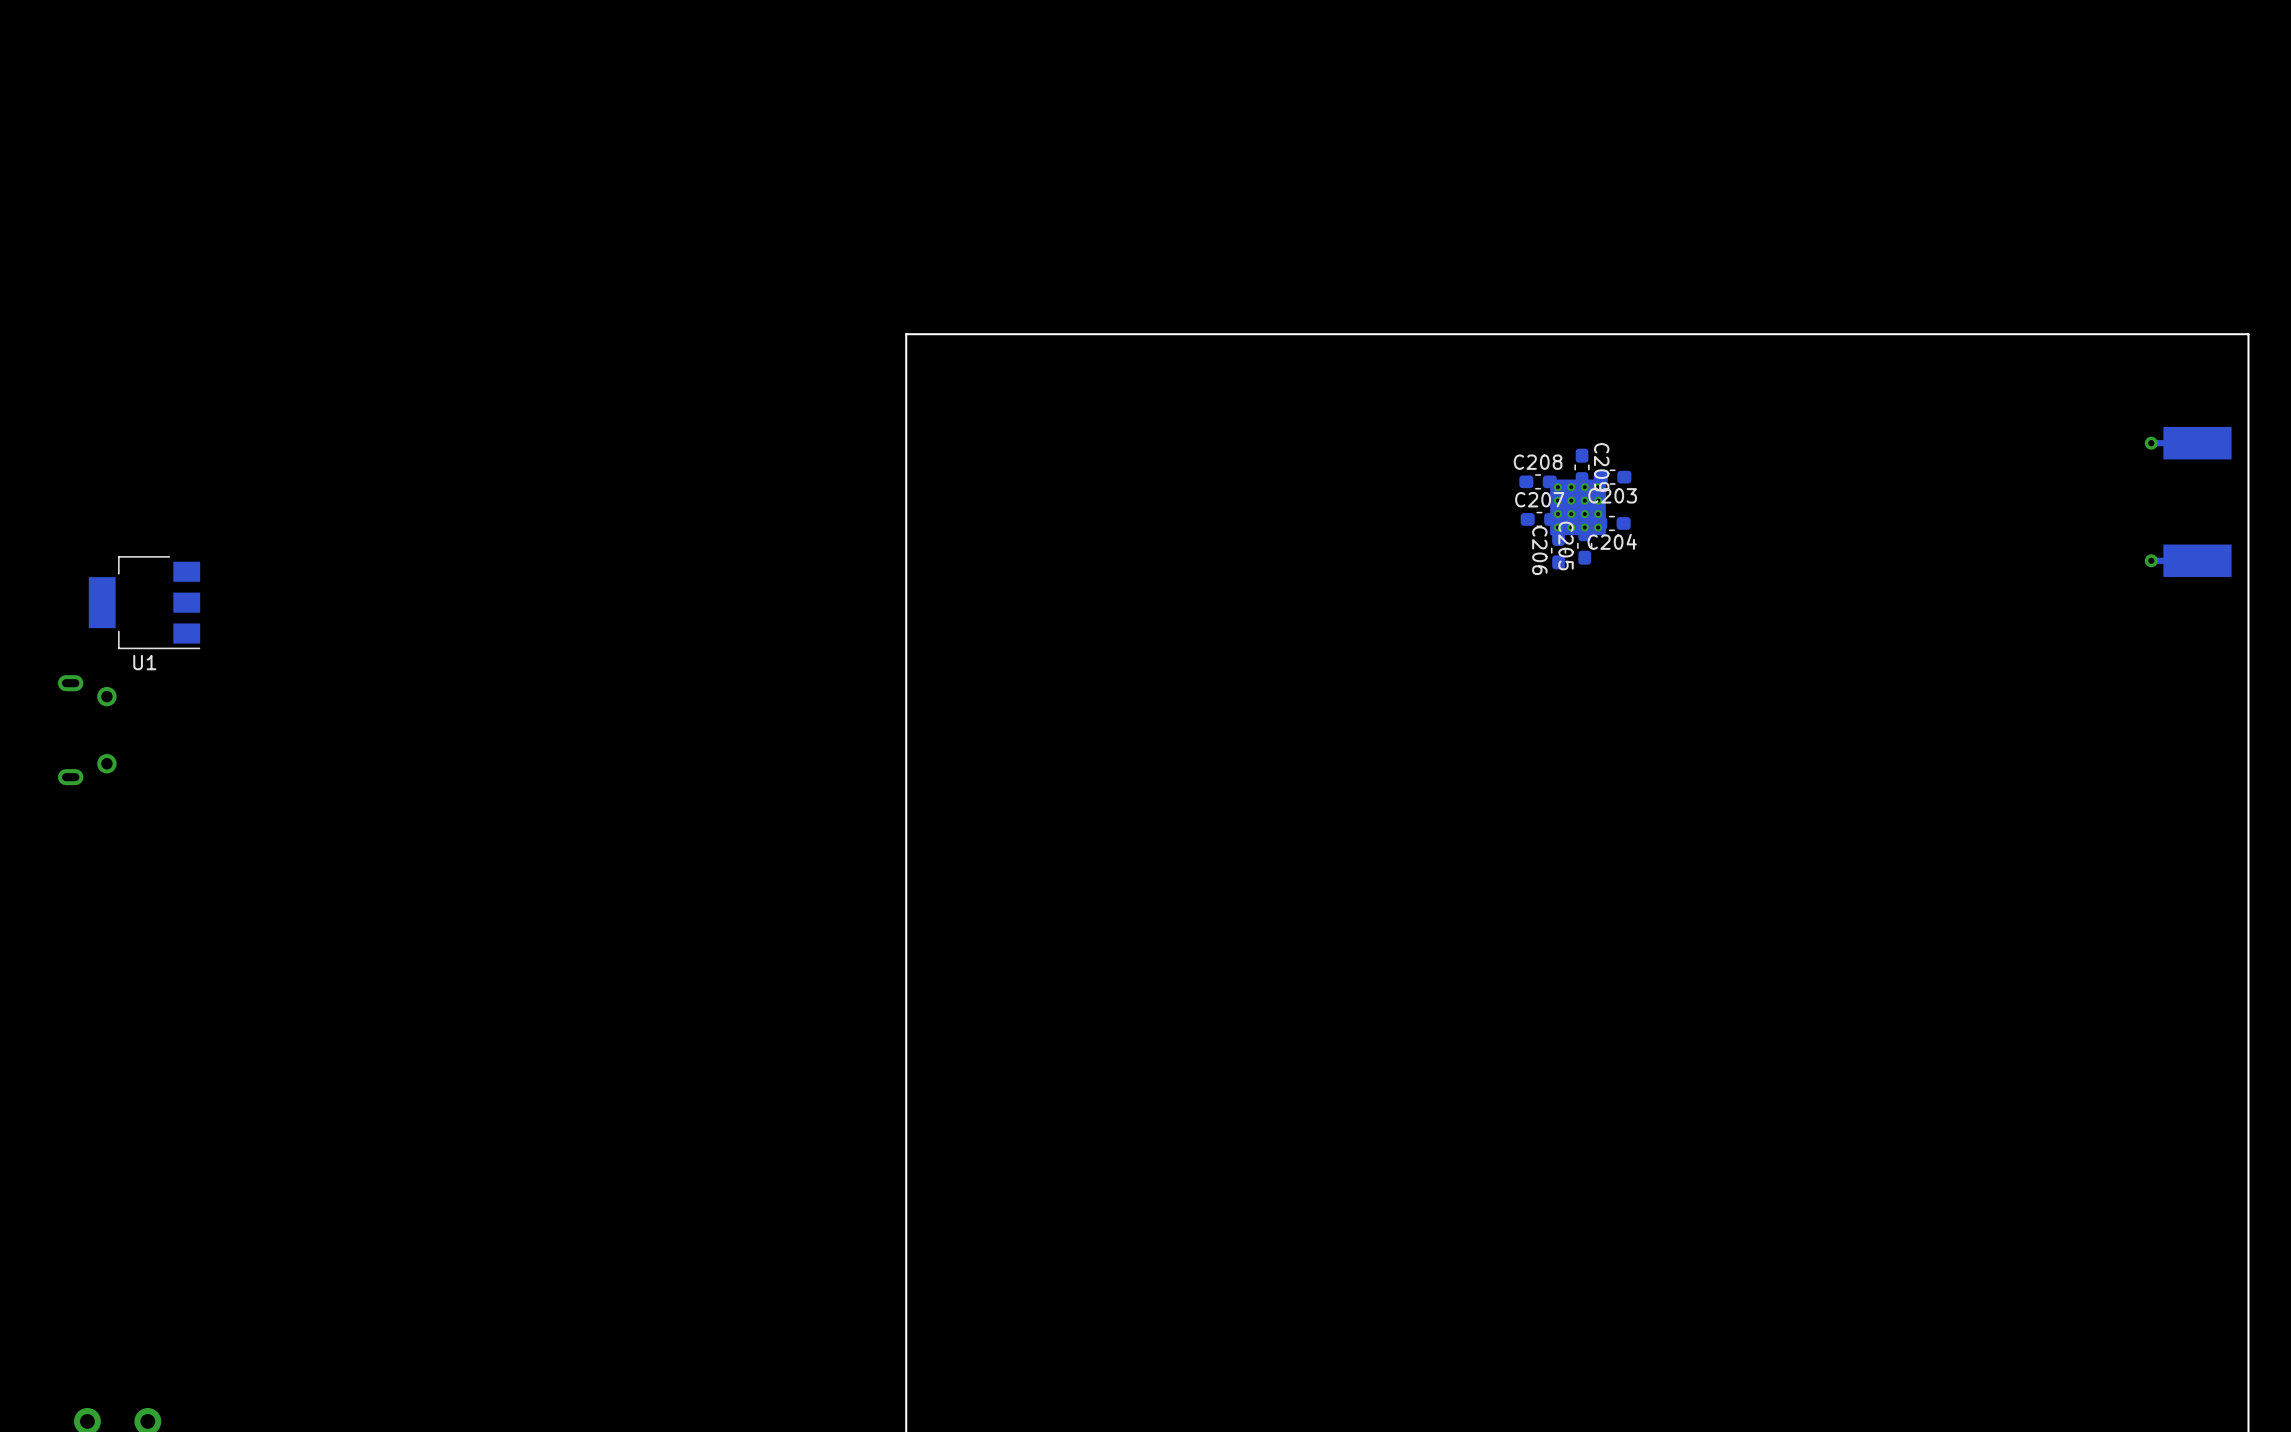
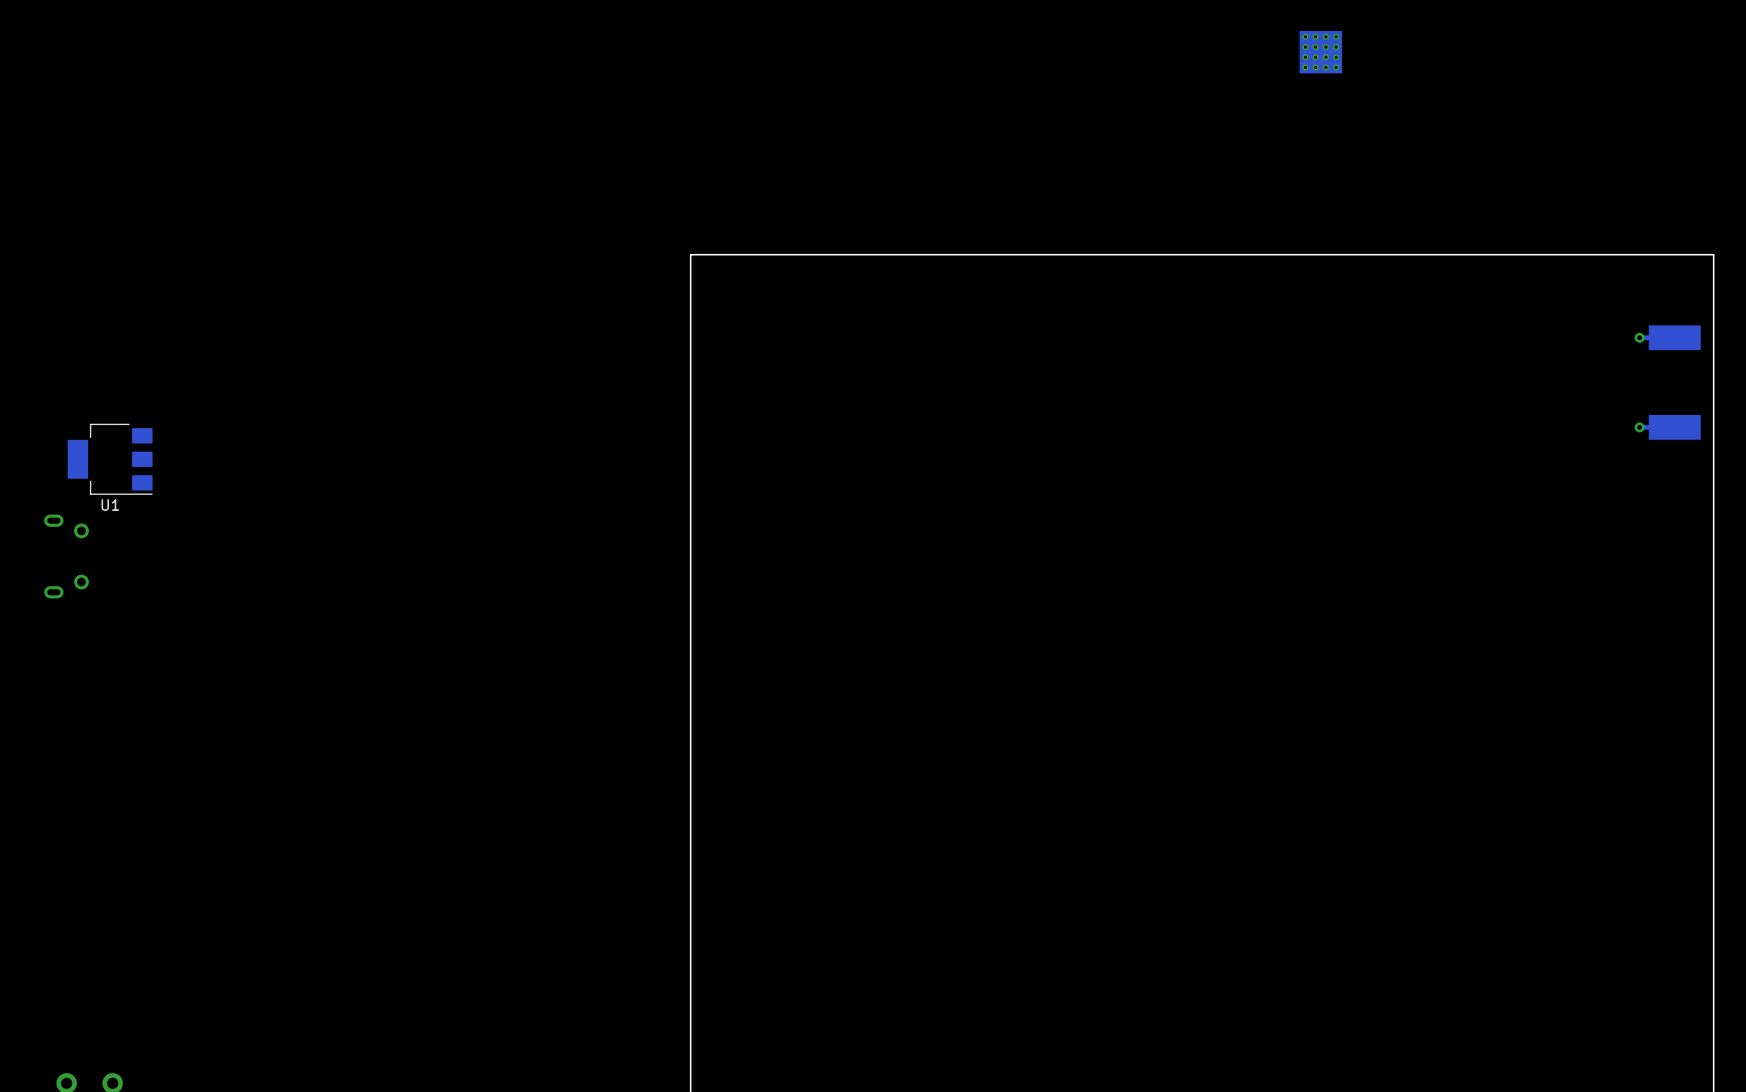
part: none -> (1320, 52)
C209: (1582, 467) -> none
C203: (1612, 477) -> none
C208: (1538, 481) -> none
part: (1578, 507) -> none
C207: (1539, 519) -> none
C204: (1611, 523) -> none
C205: (1584, 545) -> none
C206: (1558, 550) -> none

